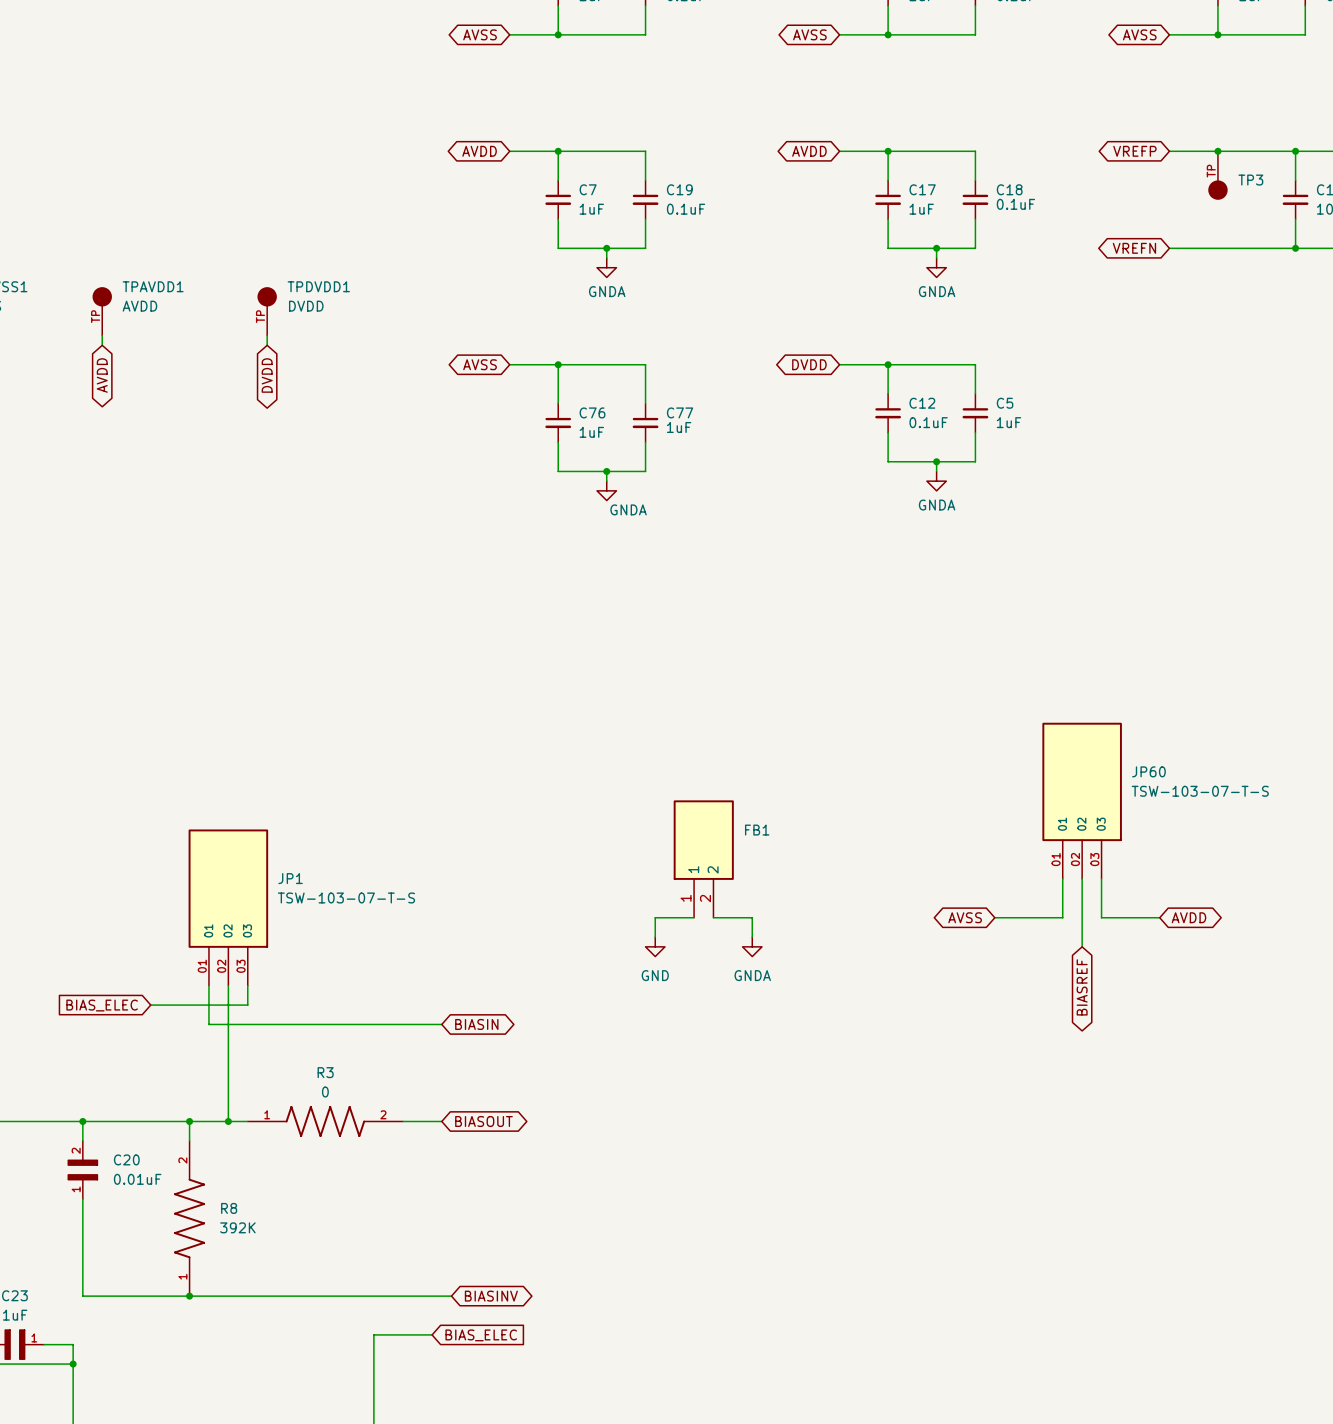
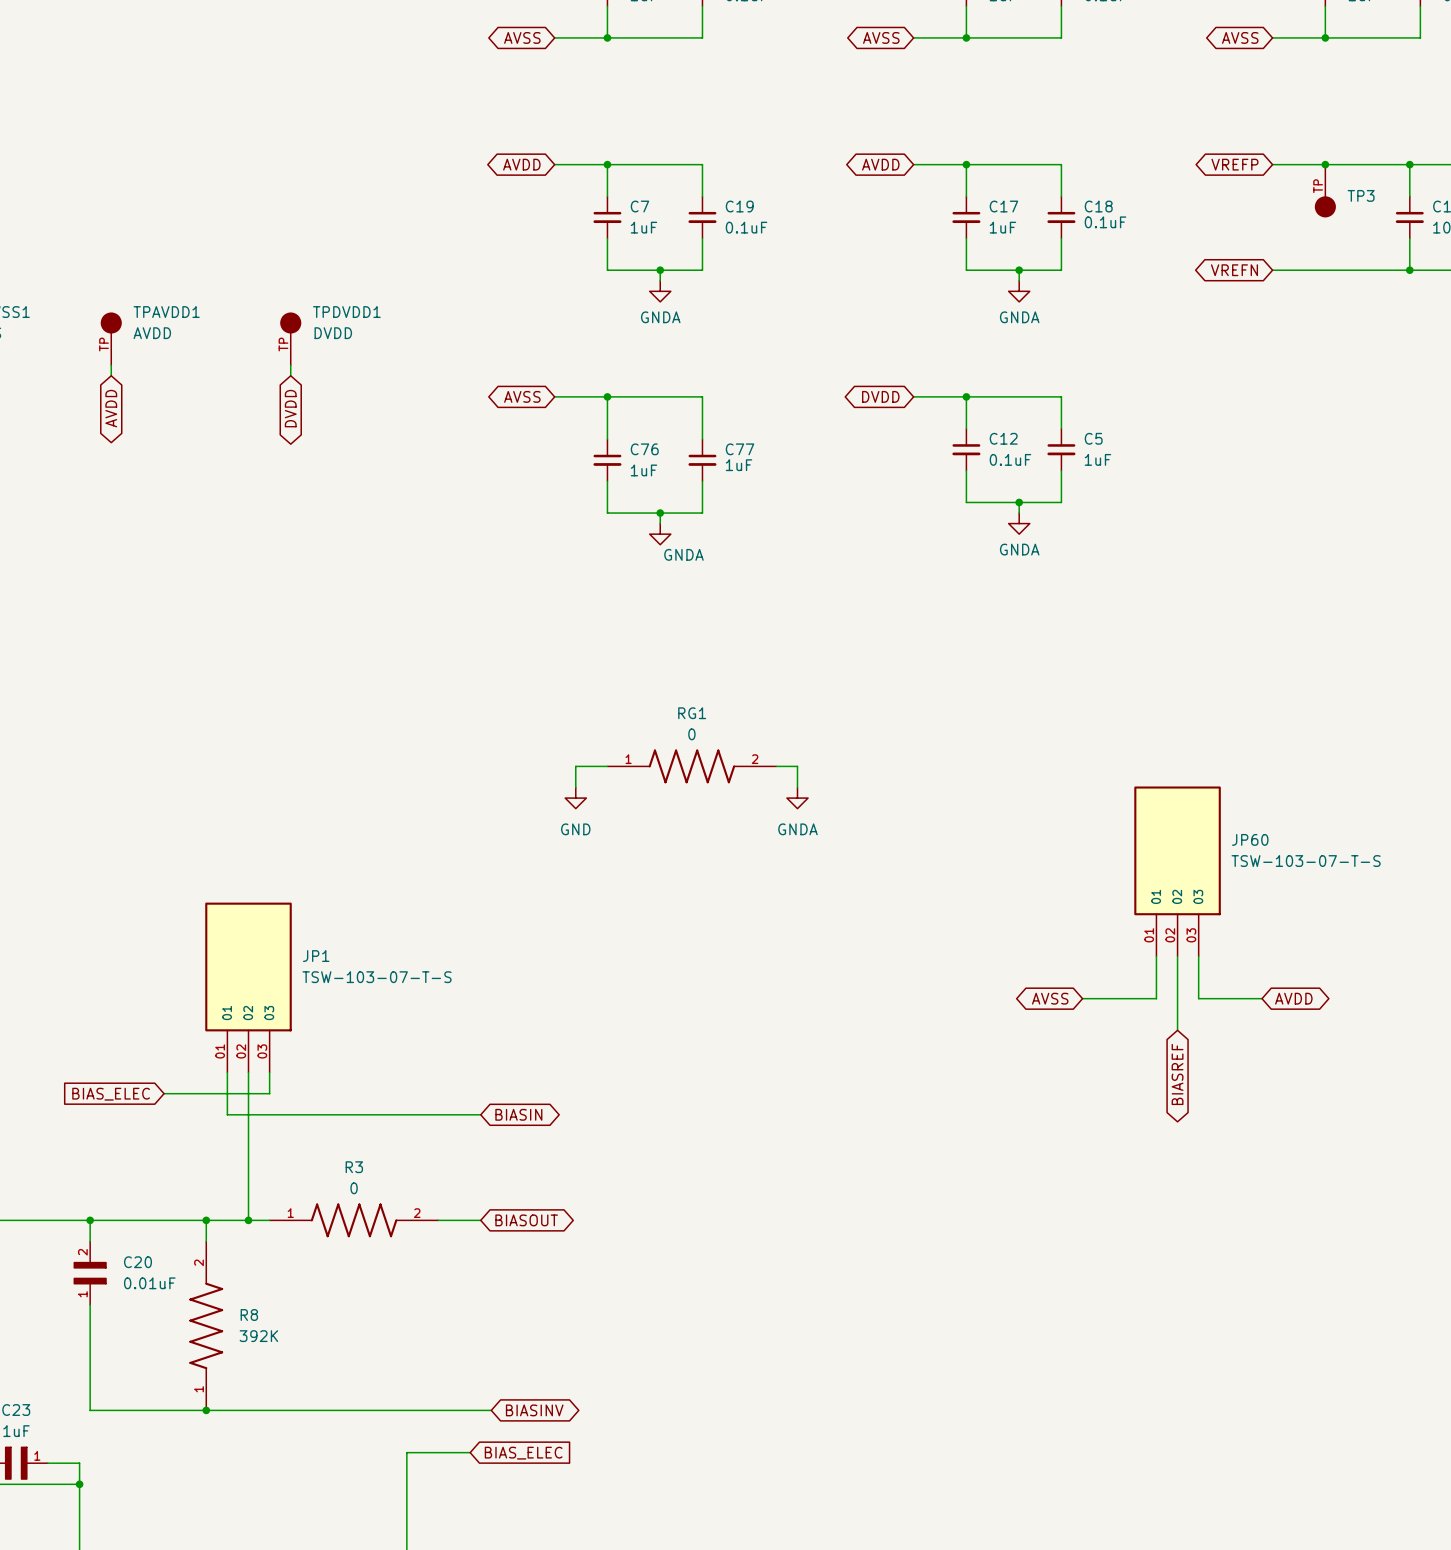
wire: none -> (607, 766) (575, 766) (575, 787)
RG1: none -> 0 (691, 766)
wire: none -> (776, 766) (797, 766) (797, 787)
power symbol: none -> GND (575, 798)
power symbol: none -> GNDA (797, 798)
FB1: (703, 859) -> none
wire: (694, 917) (655, 917) (655, 937) -> none
wire: (713, 917) (752, 917) (752, 937) -> none
power symbol: GND (655, 946) -> none
power symbol: GNDA (752, 946) -> none

